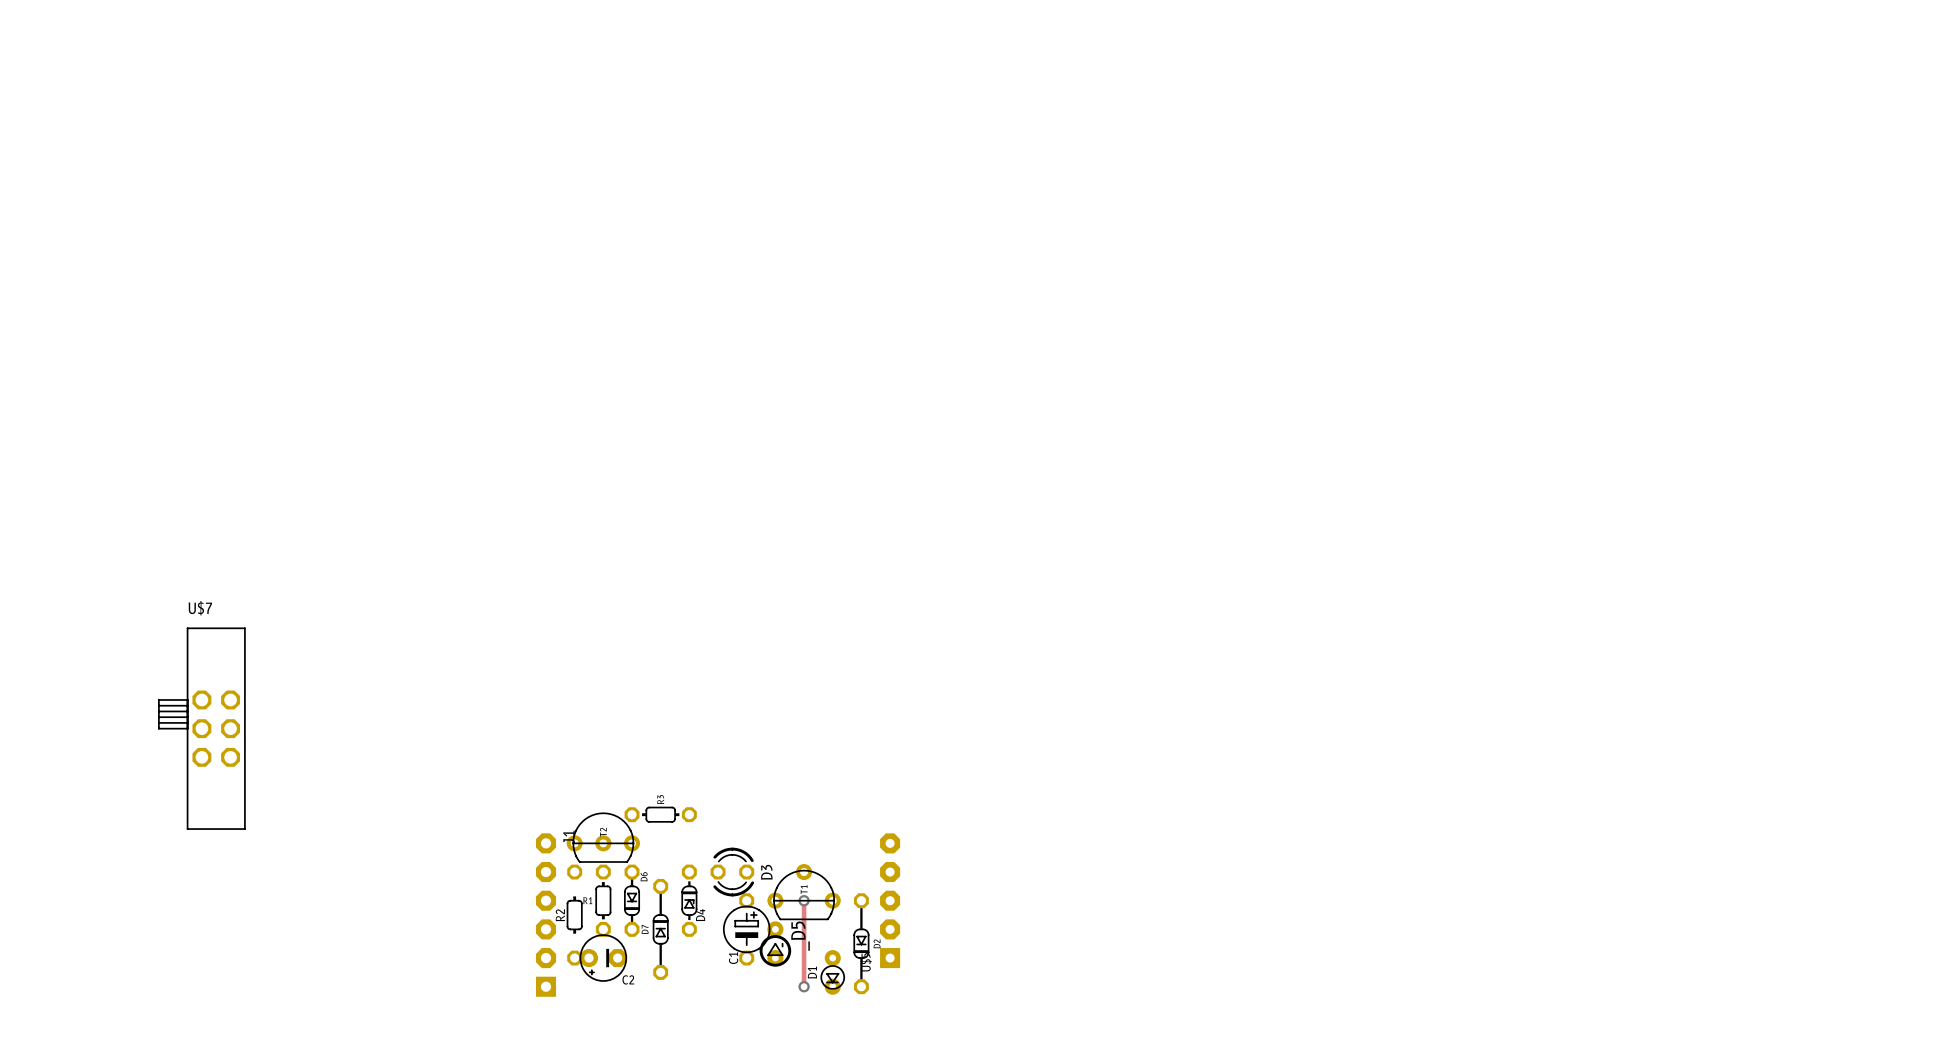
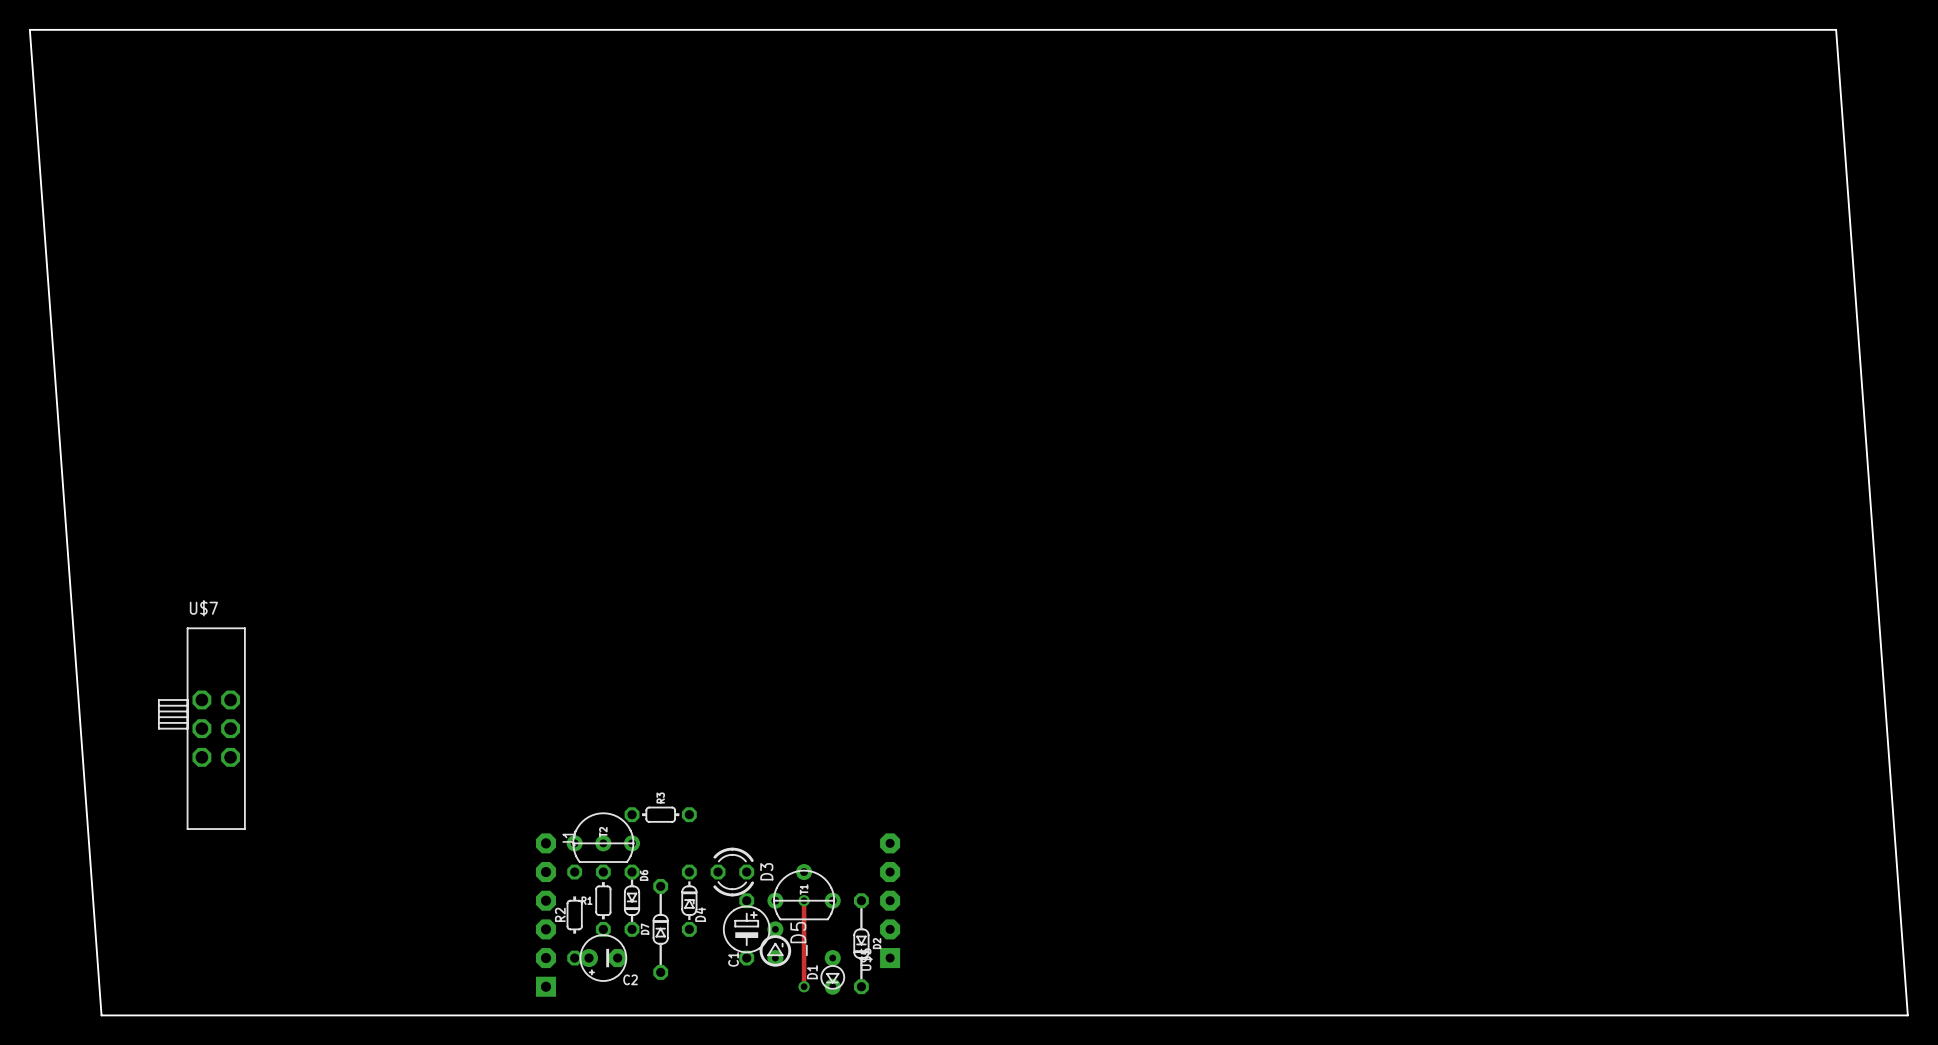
board edge: none -> (29, 29) (1836, 29) (1907, 1015) (101, 1015) (29, 29)

